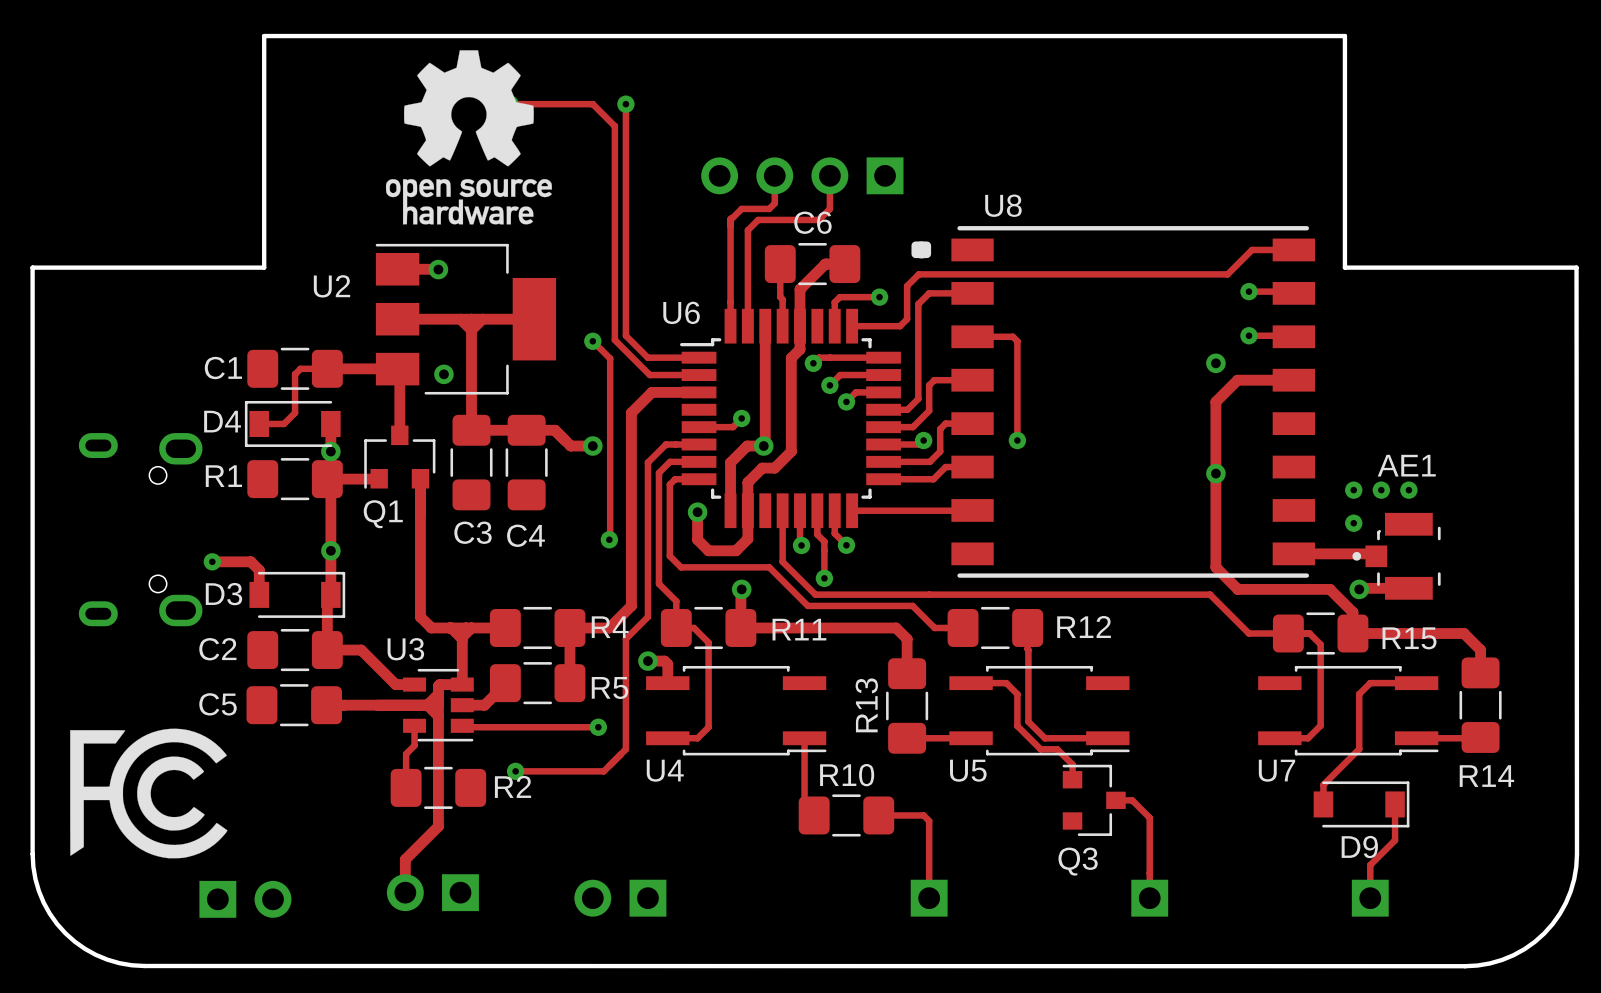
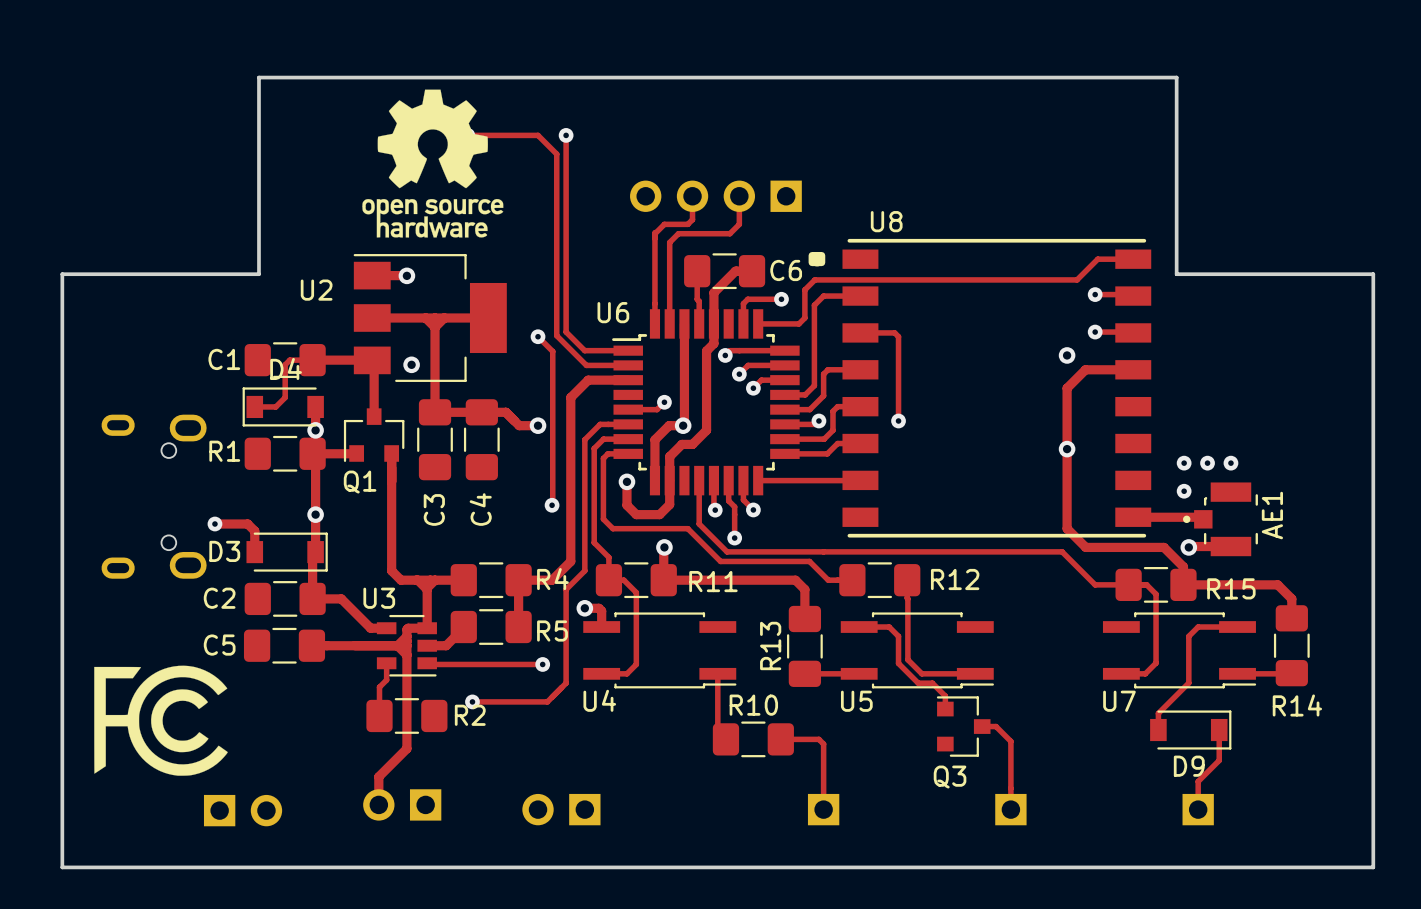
C6 name position: C6 (812, 222) -> C6 (786, 270)
board edge: (32, 267) (33, 866) (43, 902) (57, 923) (74, 941) (95, 954) (119, 963) (144, 965) (1465, 966) (1490, 963) (1513, 955) (1544, 933) (1565, 902) (1576, 866) (1576, 267) -> (62, 274) (62, 867) (1373, 867) (1373, 274)
D4 name position: D4 (222, 421) -> D4 (286, 368)
AE1 name rotation: 0° (1406, 465) -> 90° counterclockwise (1272, 515)
AE1 name position: AE1 (1406, 465) -> AE1 (1272, 515)
C3 name rotation: 0° (473, 532) -> 90° counterclockwise (434, 509)
C4 name rotation: 0° (525, 535) -> 90° counterclockwise (480, 509)

